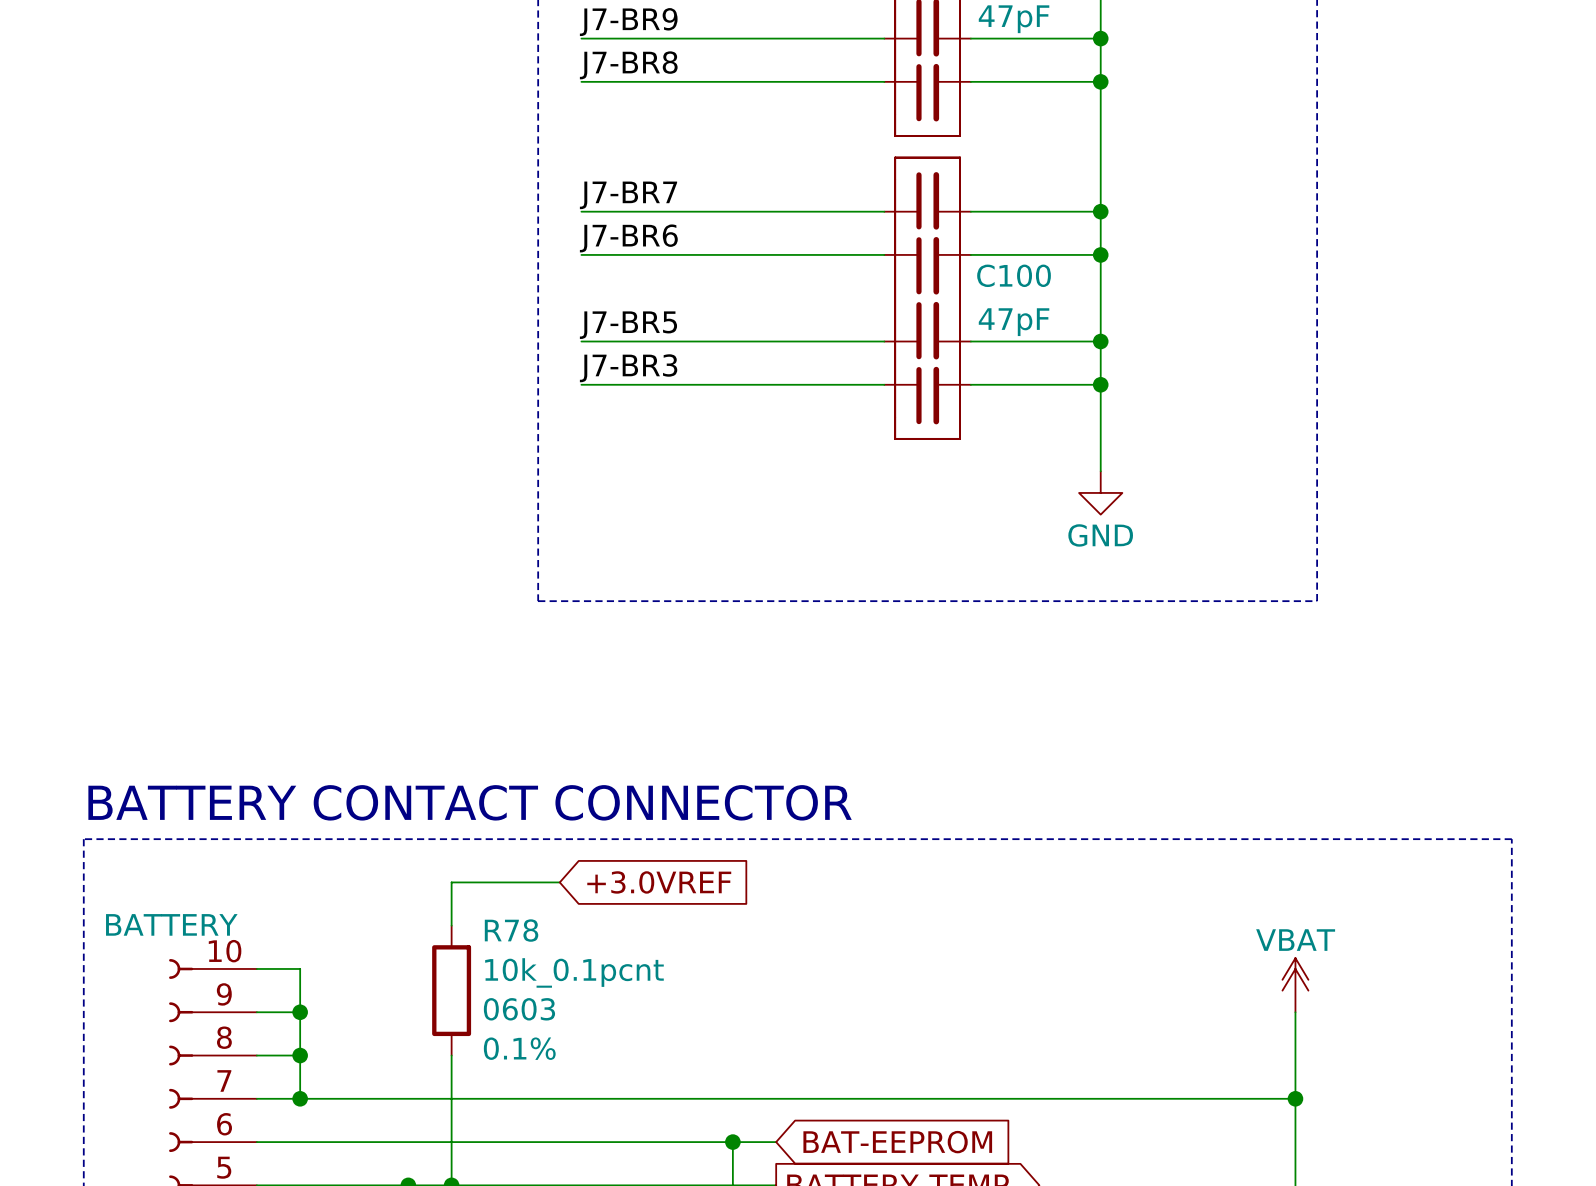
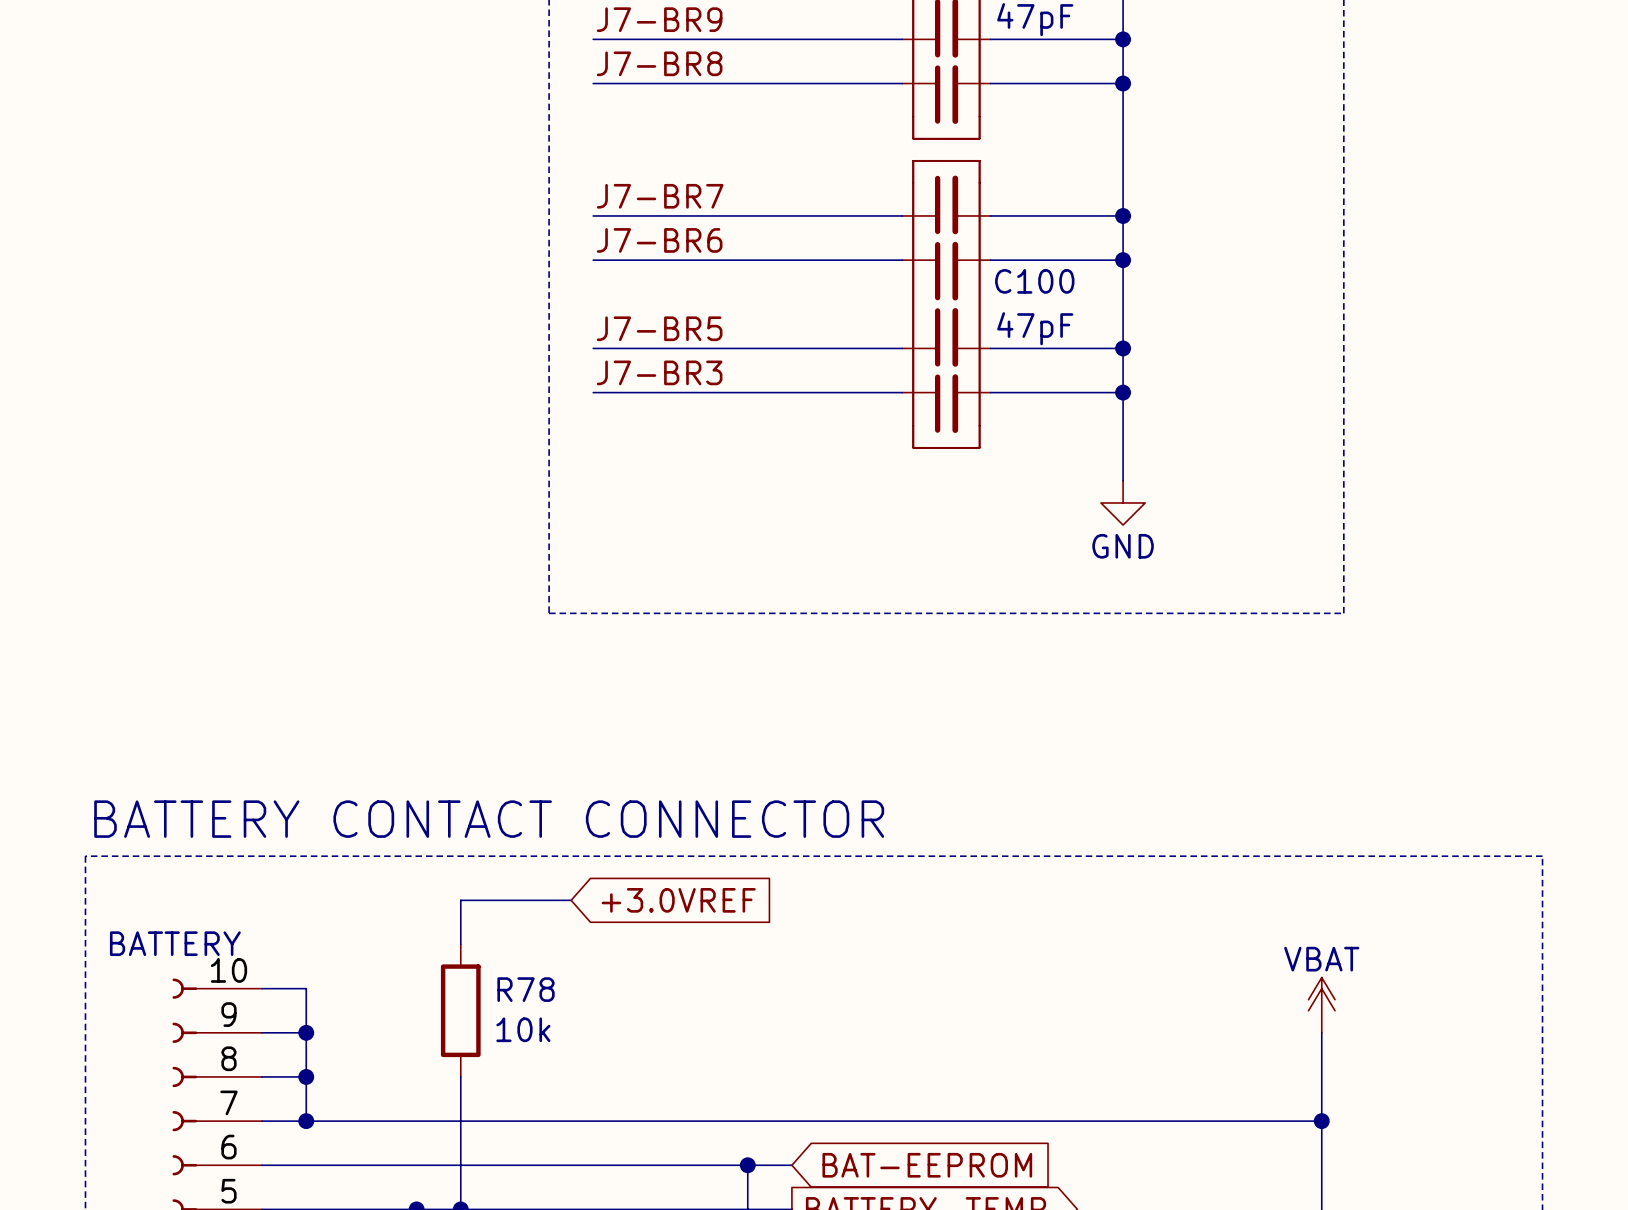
R78 name position: R78 (511, 930) -> R78 (526, 989)
R78 value: 10k_0.1pcnt (574, 972) -> 10k (523, 1029)
R78 text: 0603 (519, 1009) -> none
R78 text: 0.1% (519, 1048) -> none

